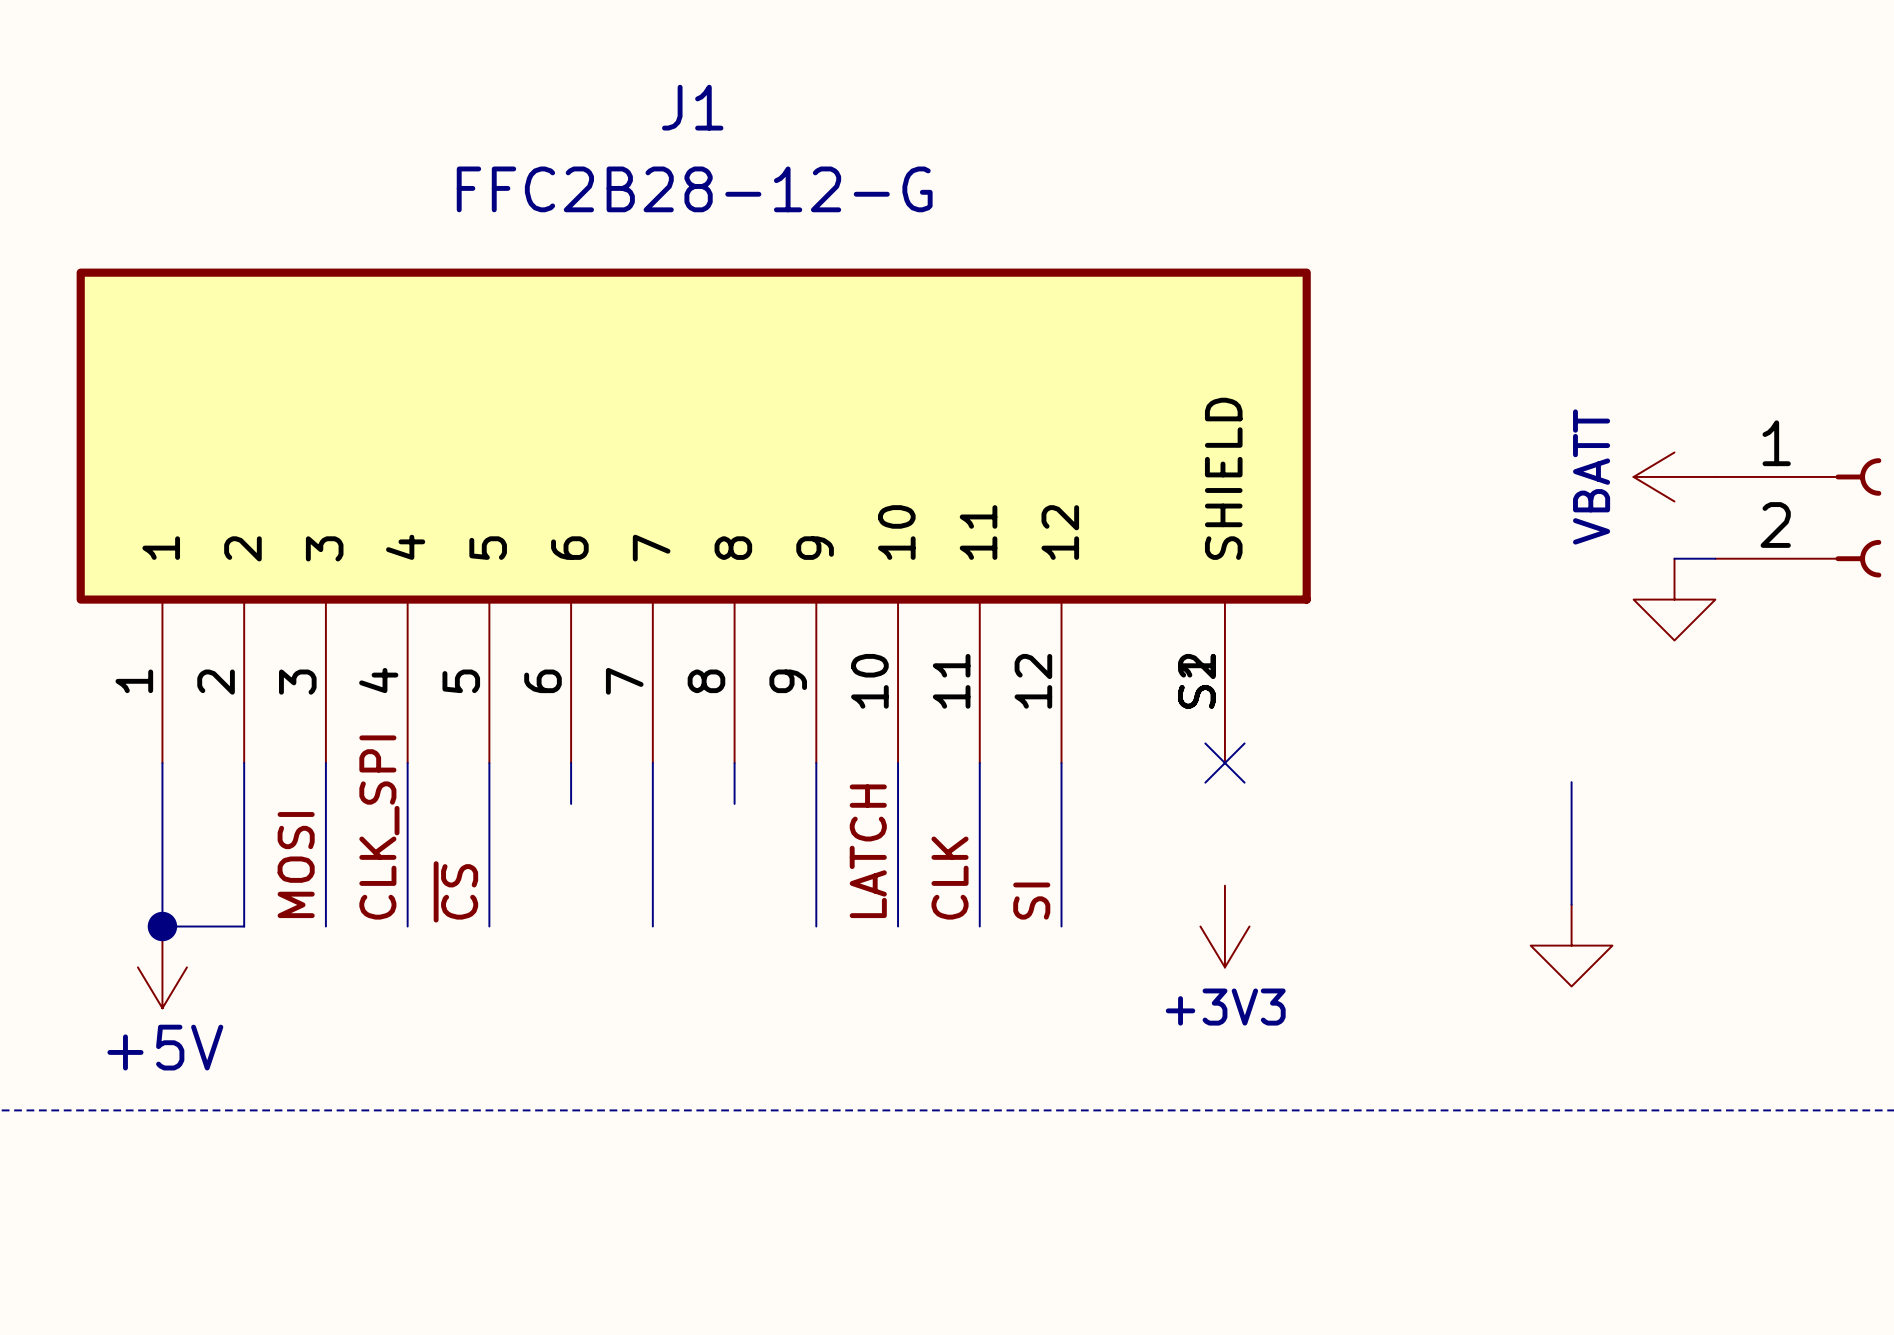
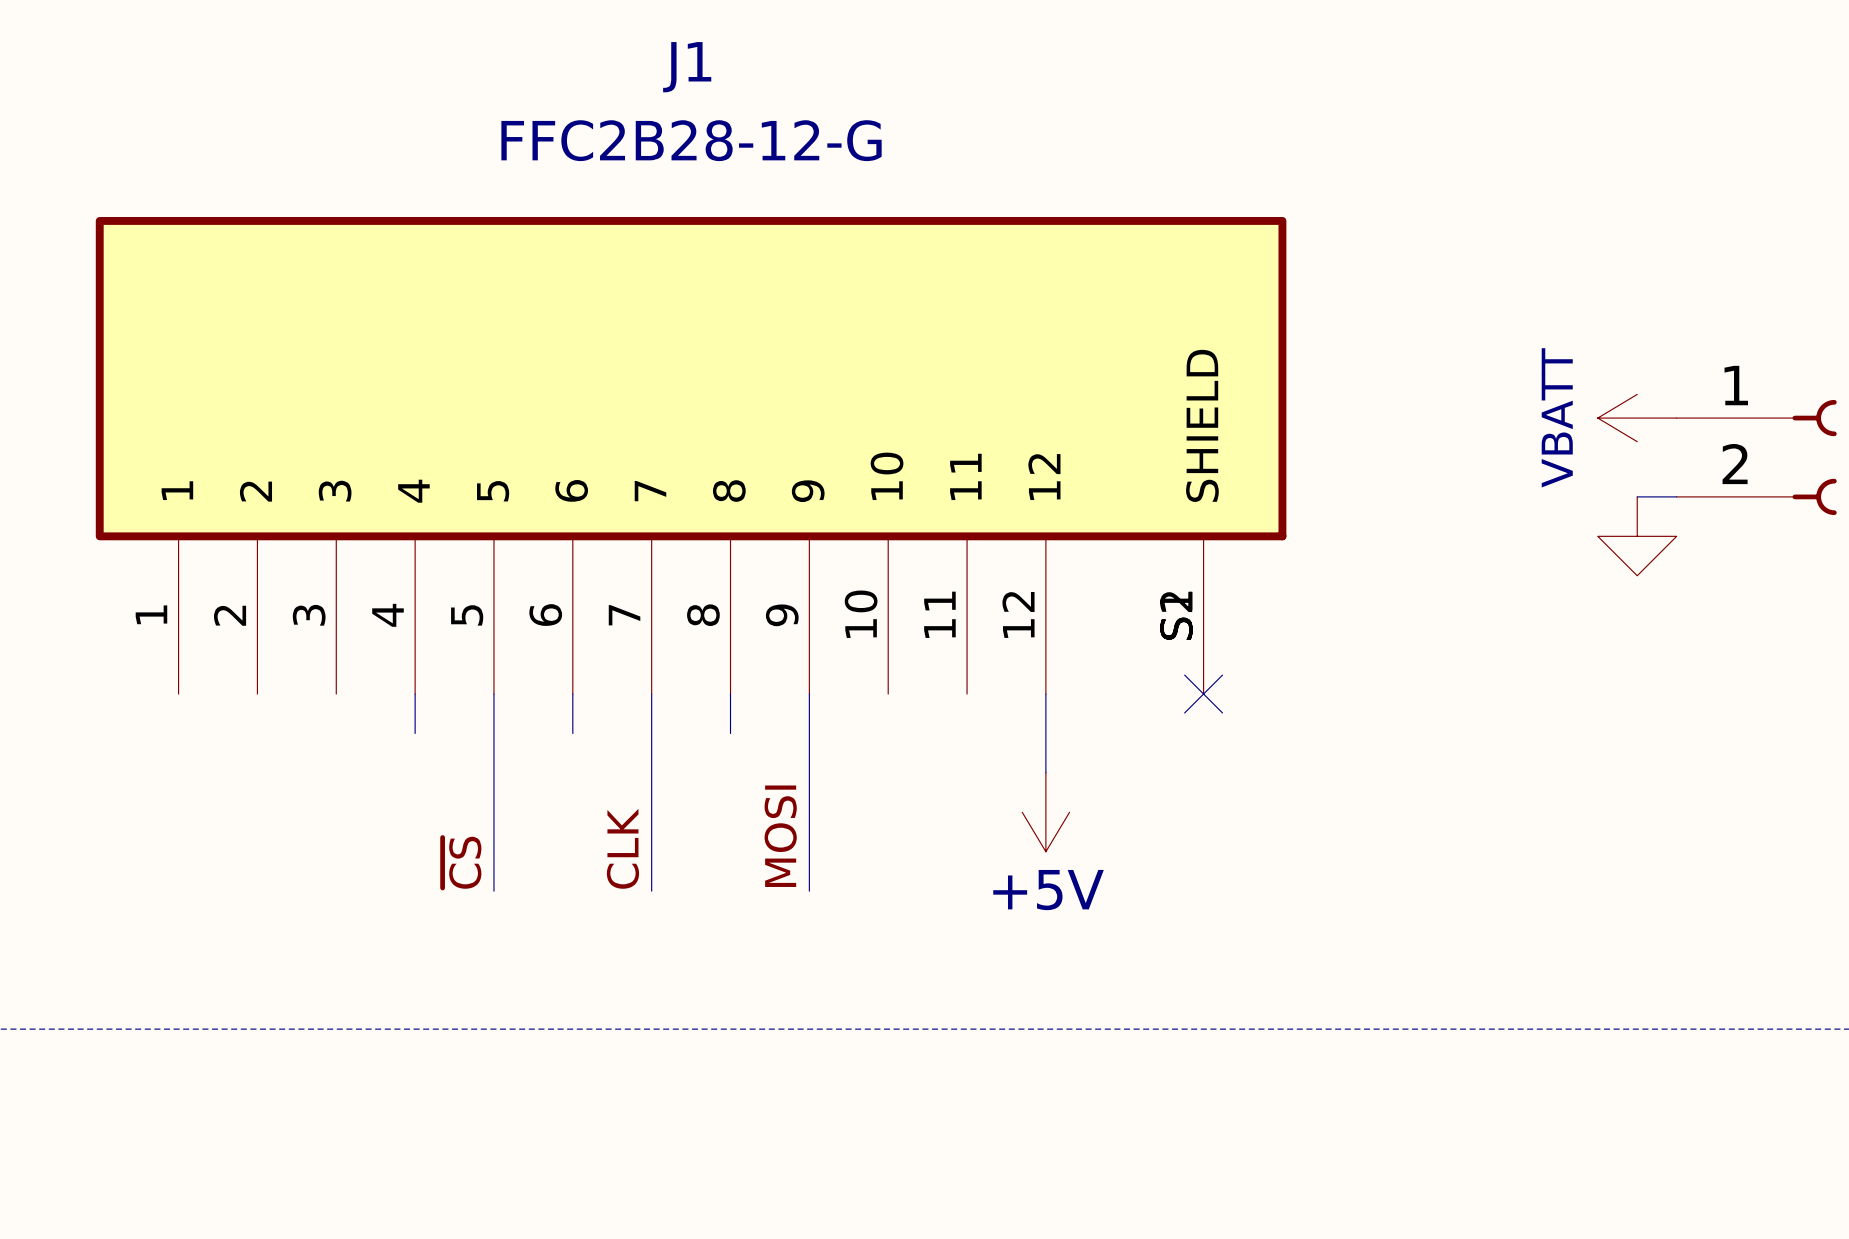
wire: (162, 763) (162, 926) (244, 926) (244, 763) -> none
wire: (325, 763) (325, 926) -> none
wire: (898, 763) (898, 926) -> none
wire: (979, 763) (979, 926) -> none
wire: (1571, 782) (1571, 904) -> none
wire: (407, 803) (407, 926) -> none
label: CLK_SPI (379, 827) -> none
label: LATCH (868, 851) -> none
label position: MOSI (296, 865) -> MOSI (780, 836)
label position: CLK (950, 878) -> CLK (622, 848)
power symbol: none -> +5V (1045, 812)
label position: ~{CS} (455, 891) -> ~{CS} (462, 862)
label: SI (1031, 901) -> none
junction: (162, 926) -> none
wire: none -> (493, 851) (493, 891)
wire: none -> (651, 851) (651, 891)
wire: none -> (809, 851) (809, 891)
power symbol: +3V3 (1224, 926) -> none
power symbol: (1571, 945) -> none
power symbol: +5V (162, 967) -> none

